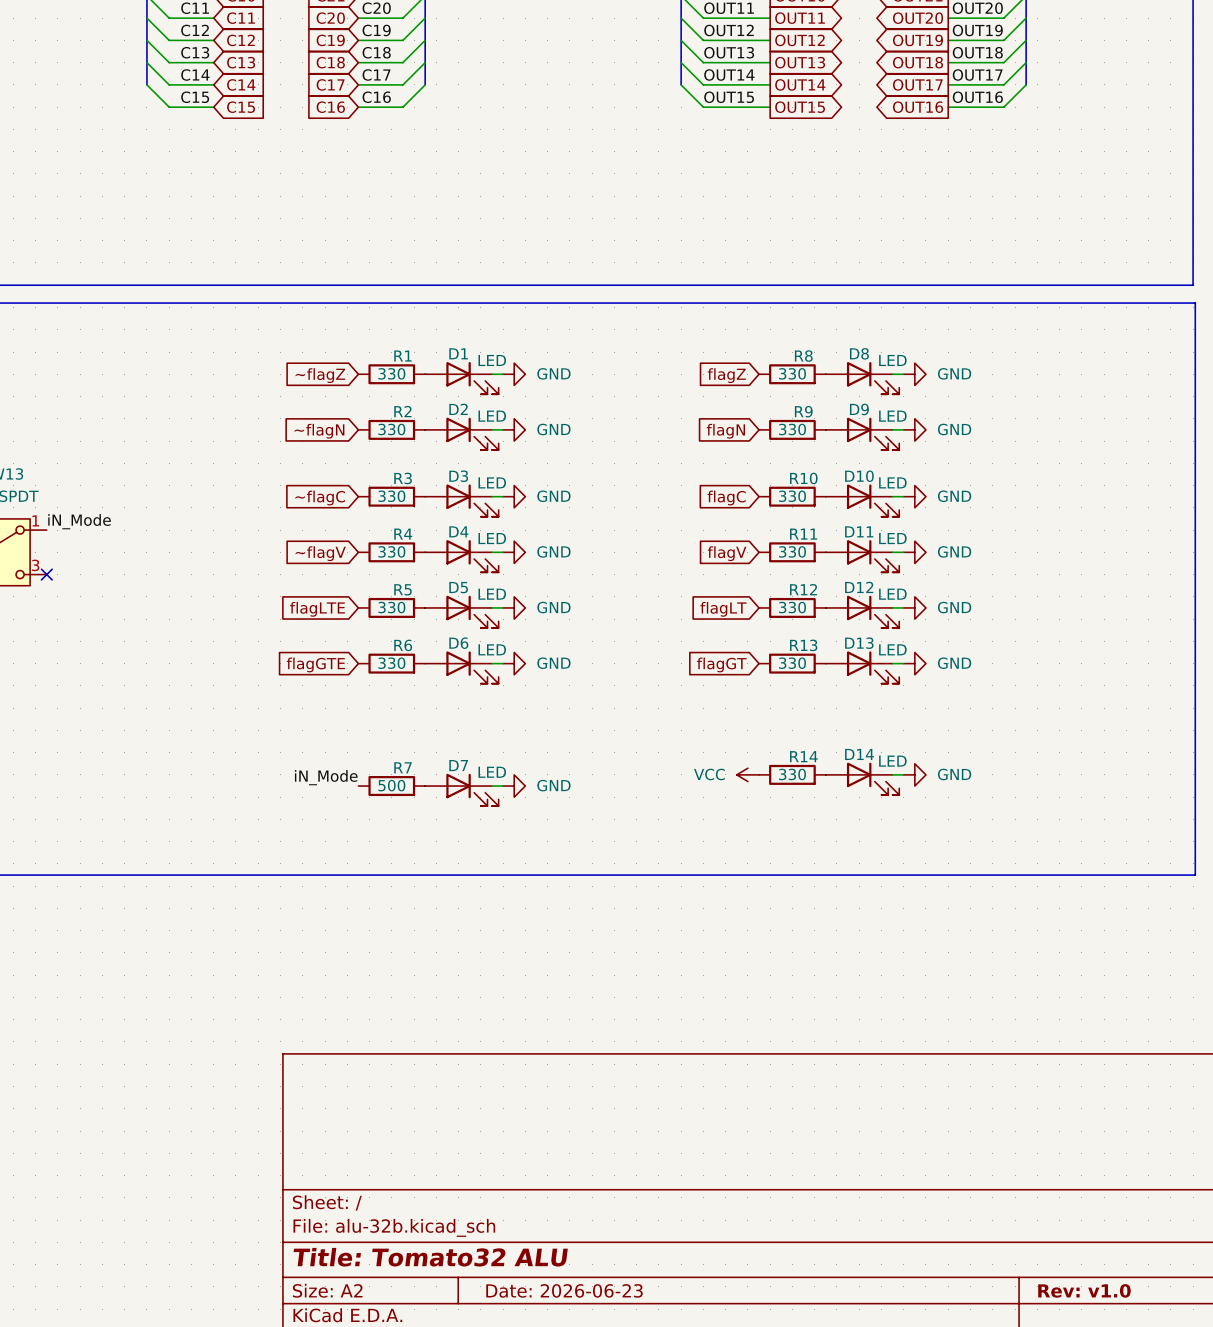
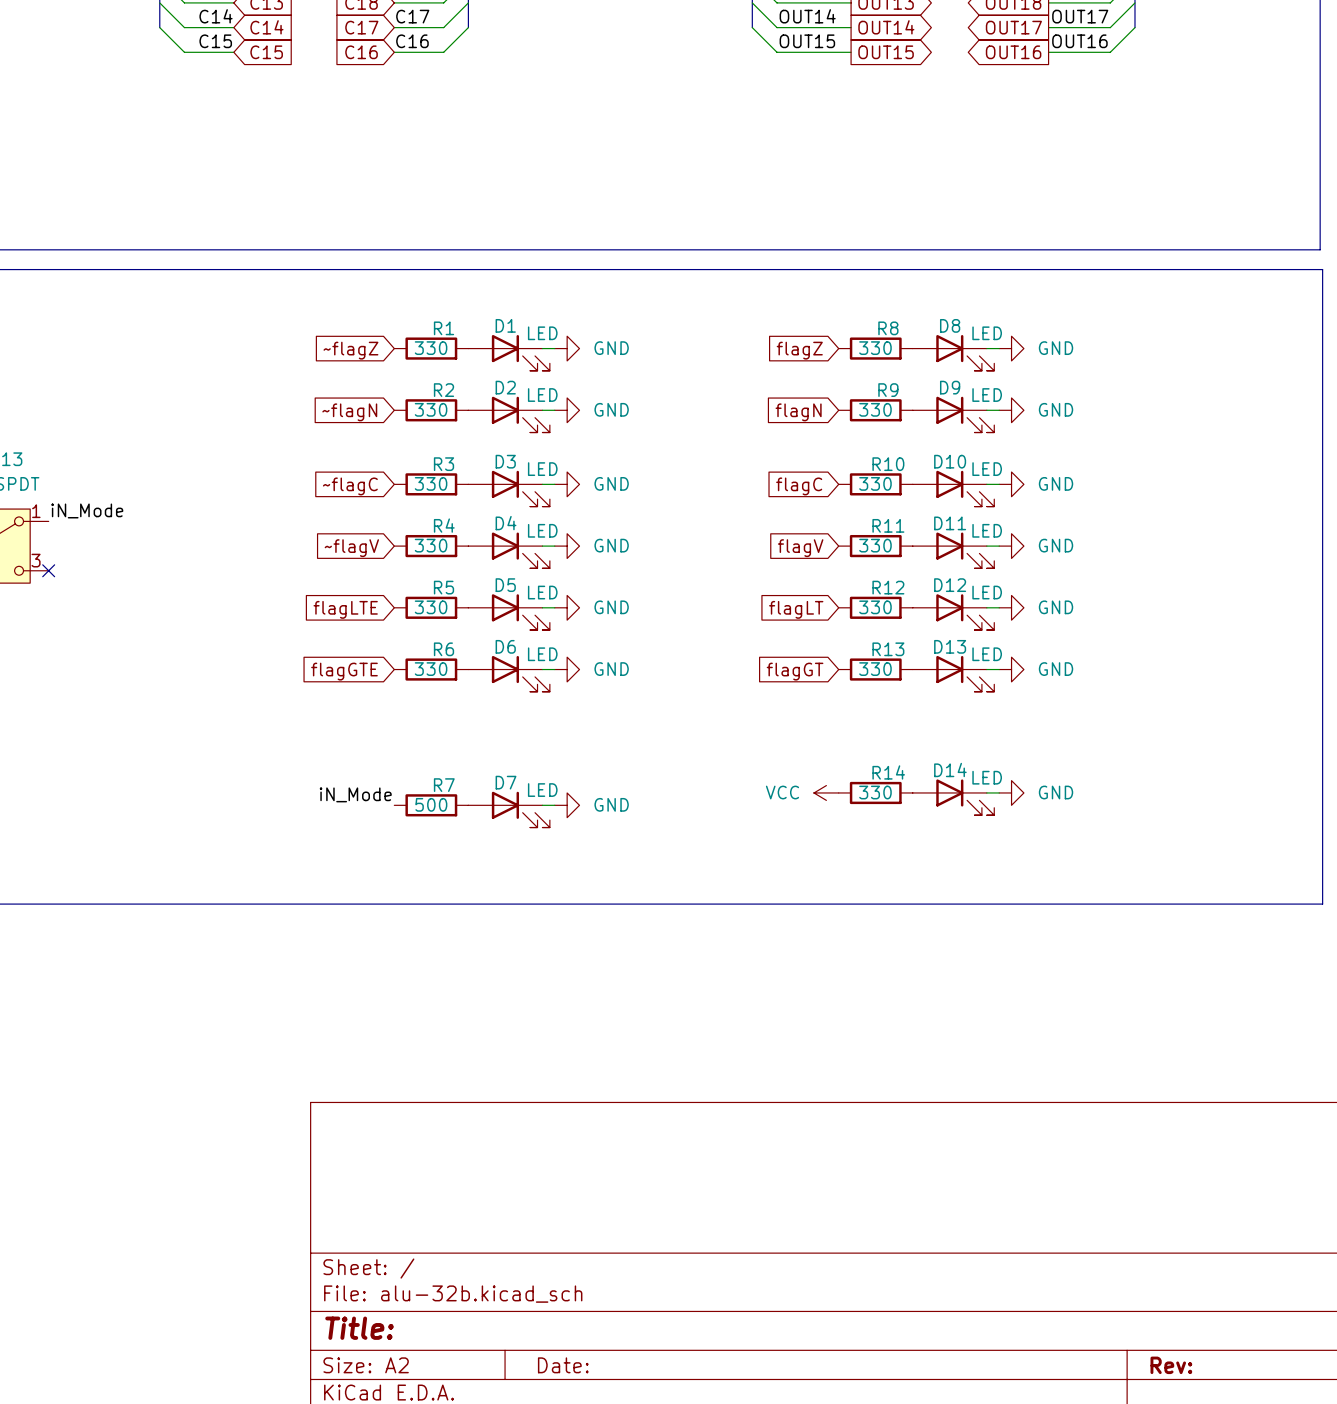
title block: Title: Tomato32 ALU (430, 1257) -> Title: (359, 1328)
title block: Date: 2026-06-23 (564, 1290) -> Date: (563, 1365)
title block: Rev: v1.0 (1084, 1290) -> Rev: (1171, 1365)

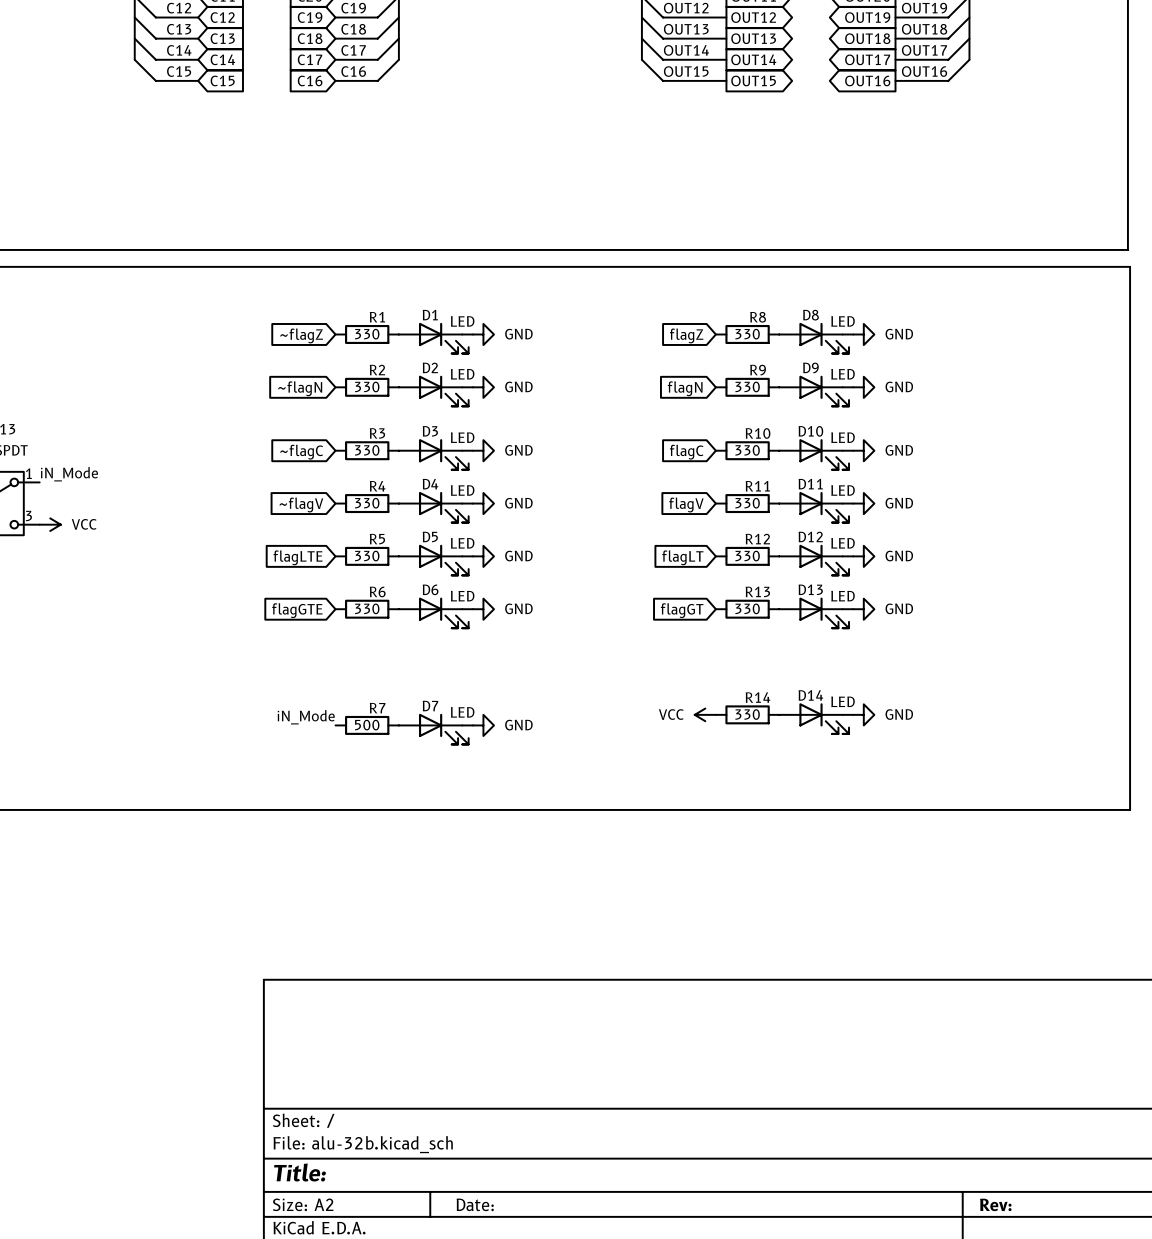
no-connect mark: (48, 570) -> none
power symbol: none -> VCC (50, 524)

